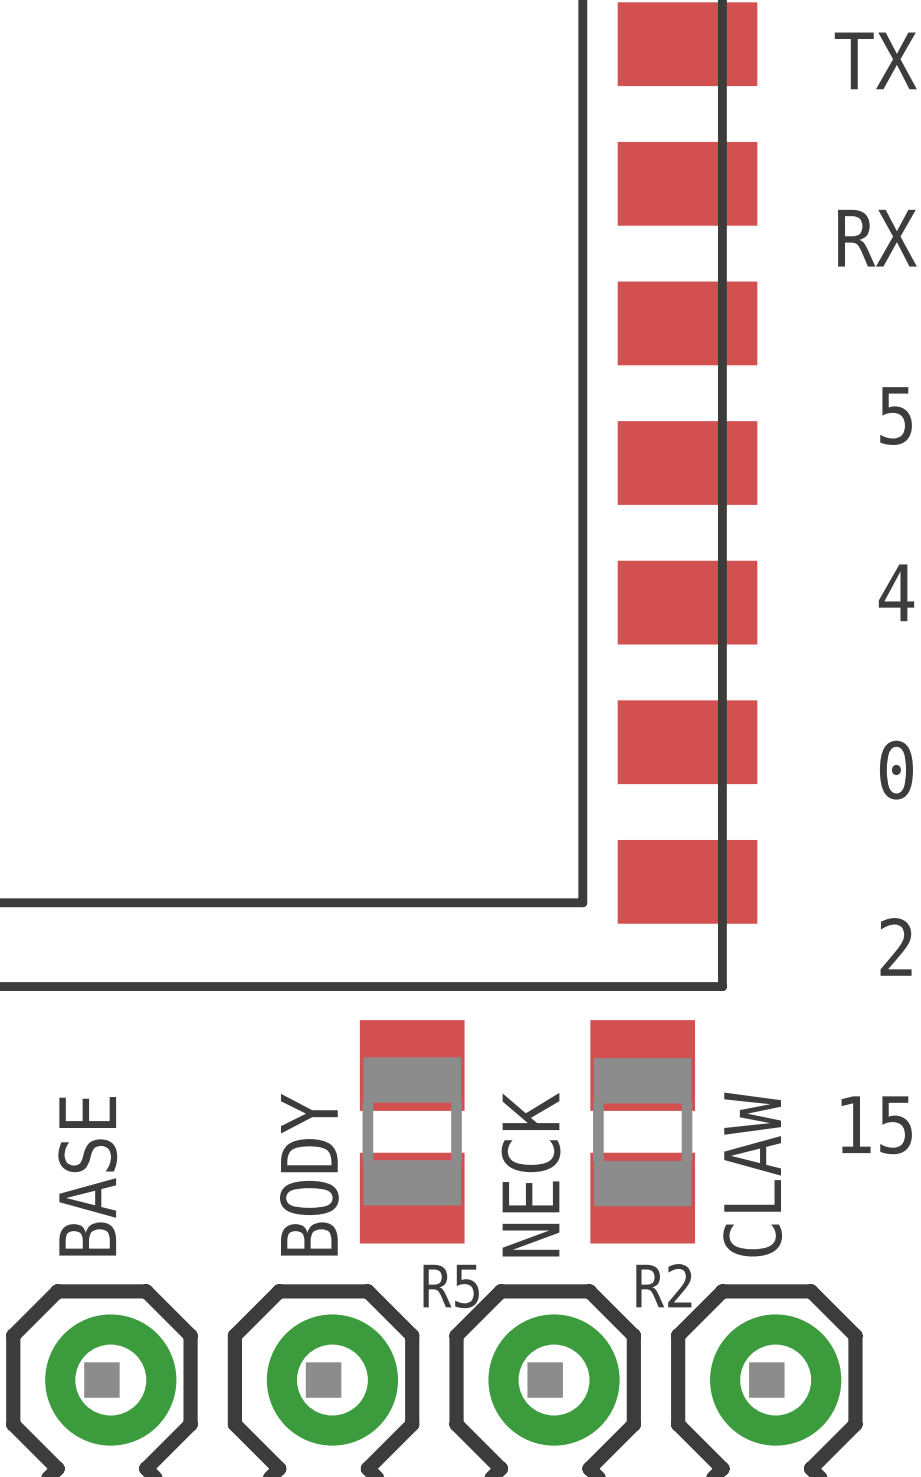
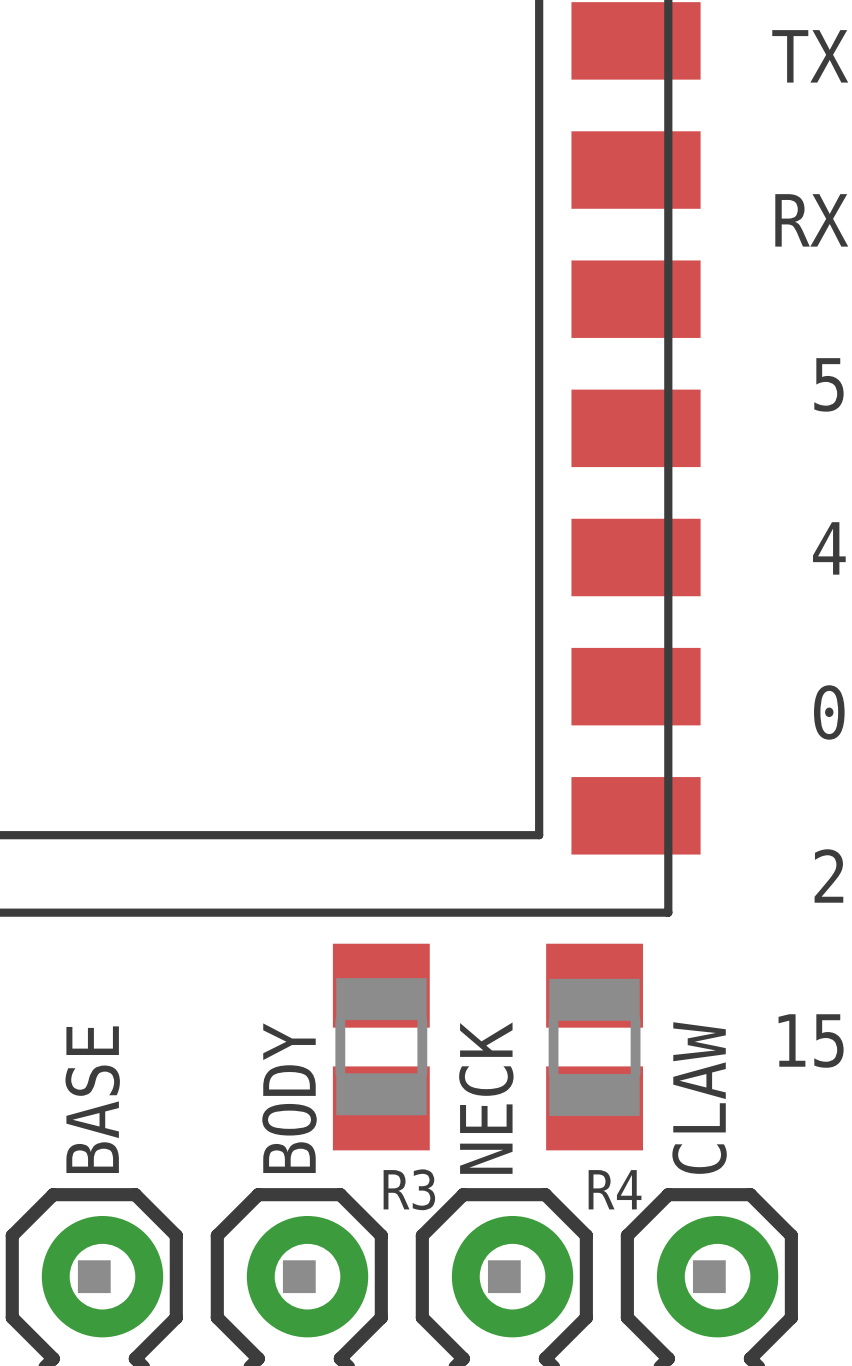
BODY name: BODY (309, 1174) -> none
NECK name: NECK (531, 1174) -> none
CLAW name: CLAW (752, 1174) -> none
BASE name: BASE (87, 1176) -> none
text: none -> CLAW (699, 1098)
text: none -> BODY (289, 1098)
text: none -> NECK (486, 1098)
text: none -> BASE (92, 1099)
R2 name: R2 (663, 1285) -> none
text: none -> R3 (409, 1189)
R5 name: R5 (451, 1286) -> none
text: none -> R4 (615, 1189)

